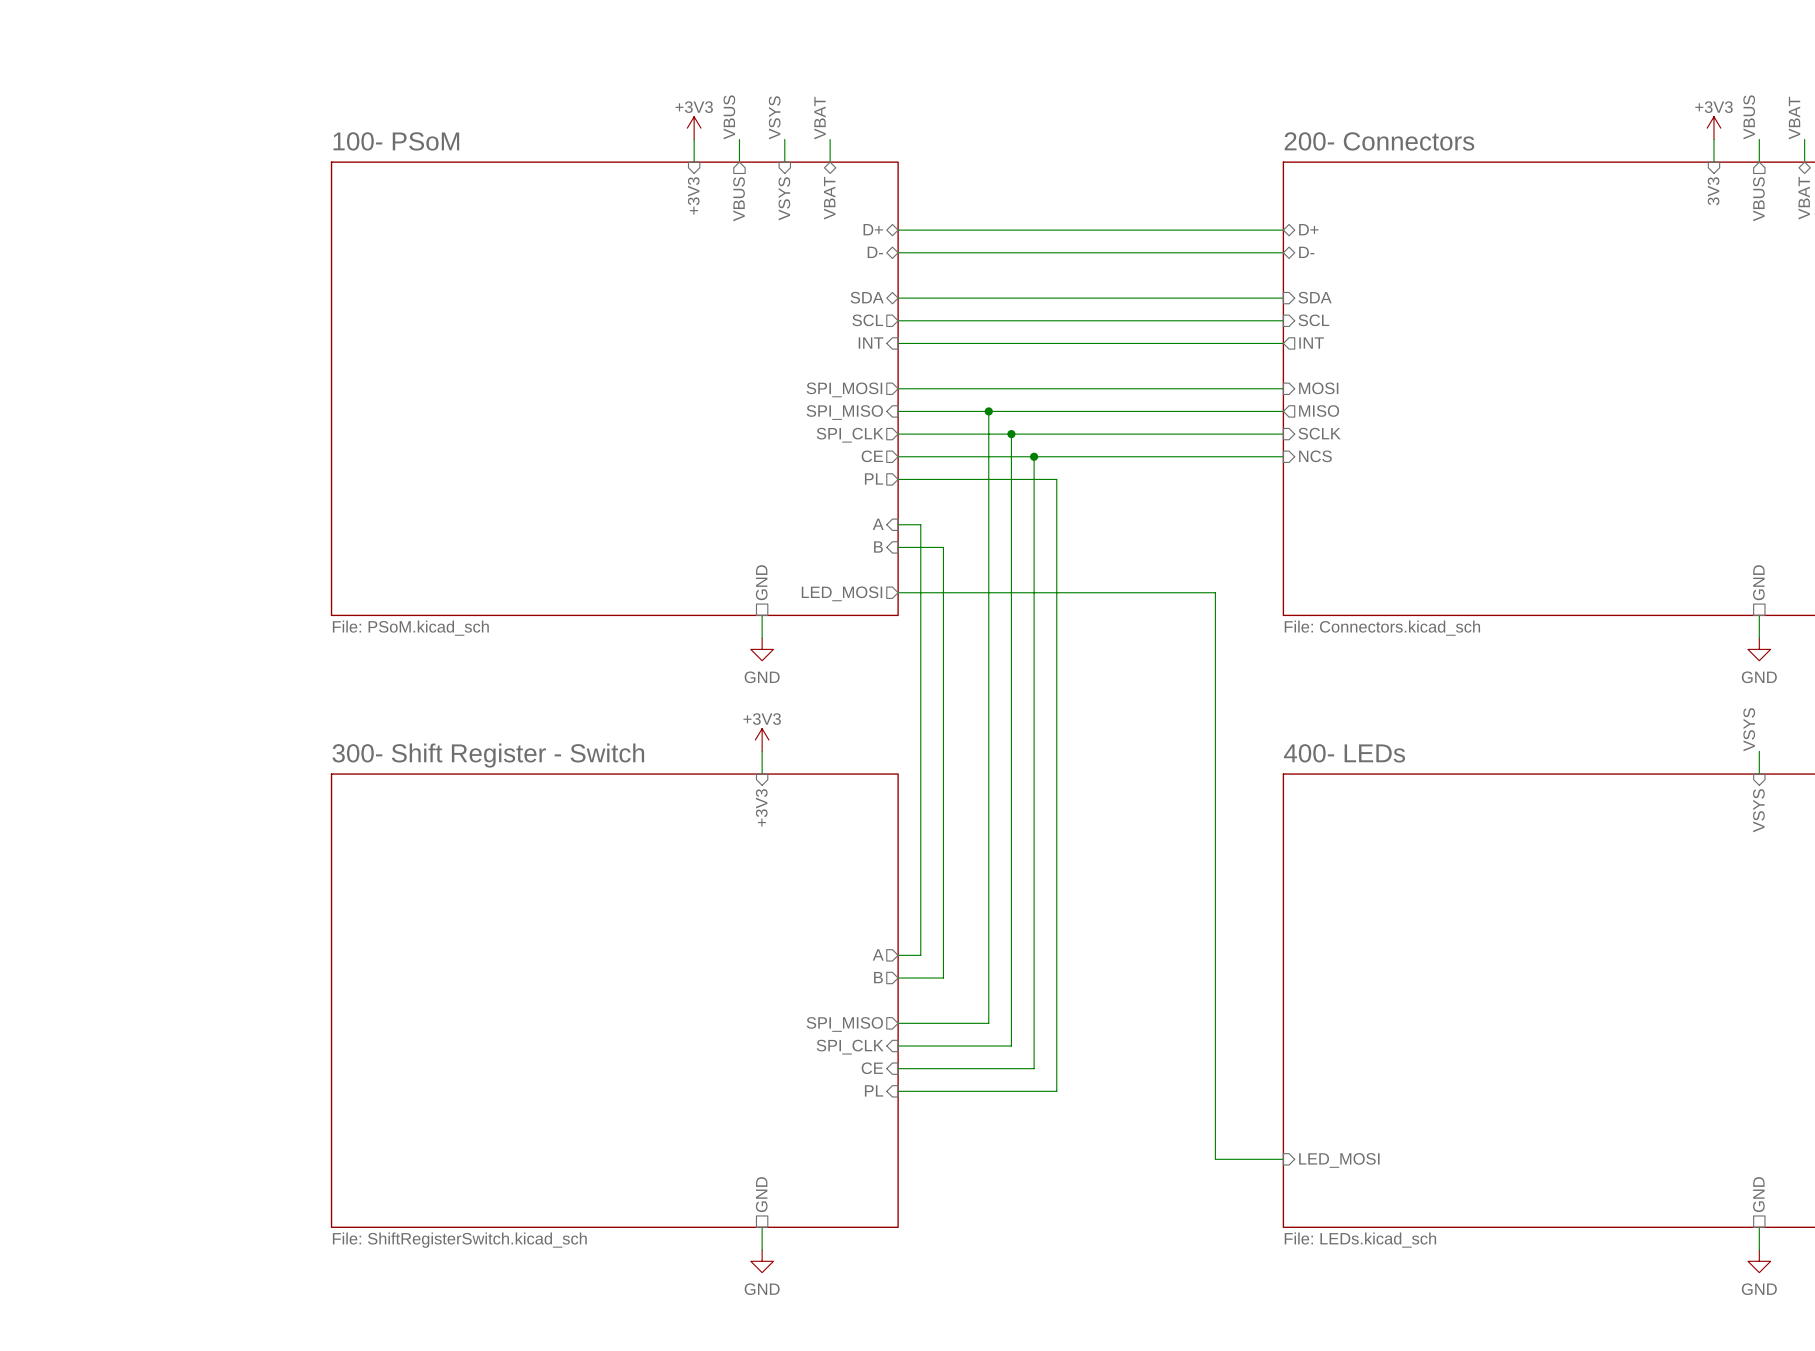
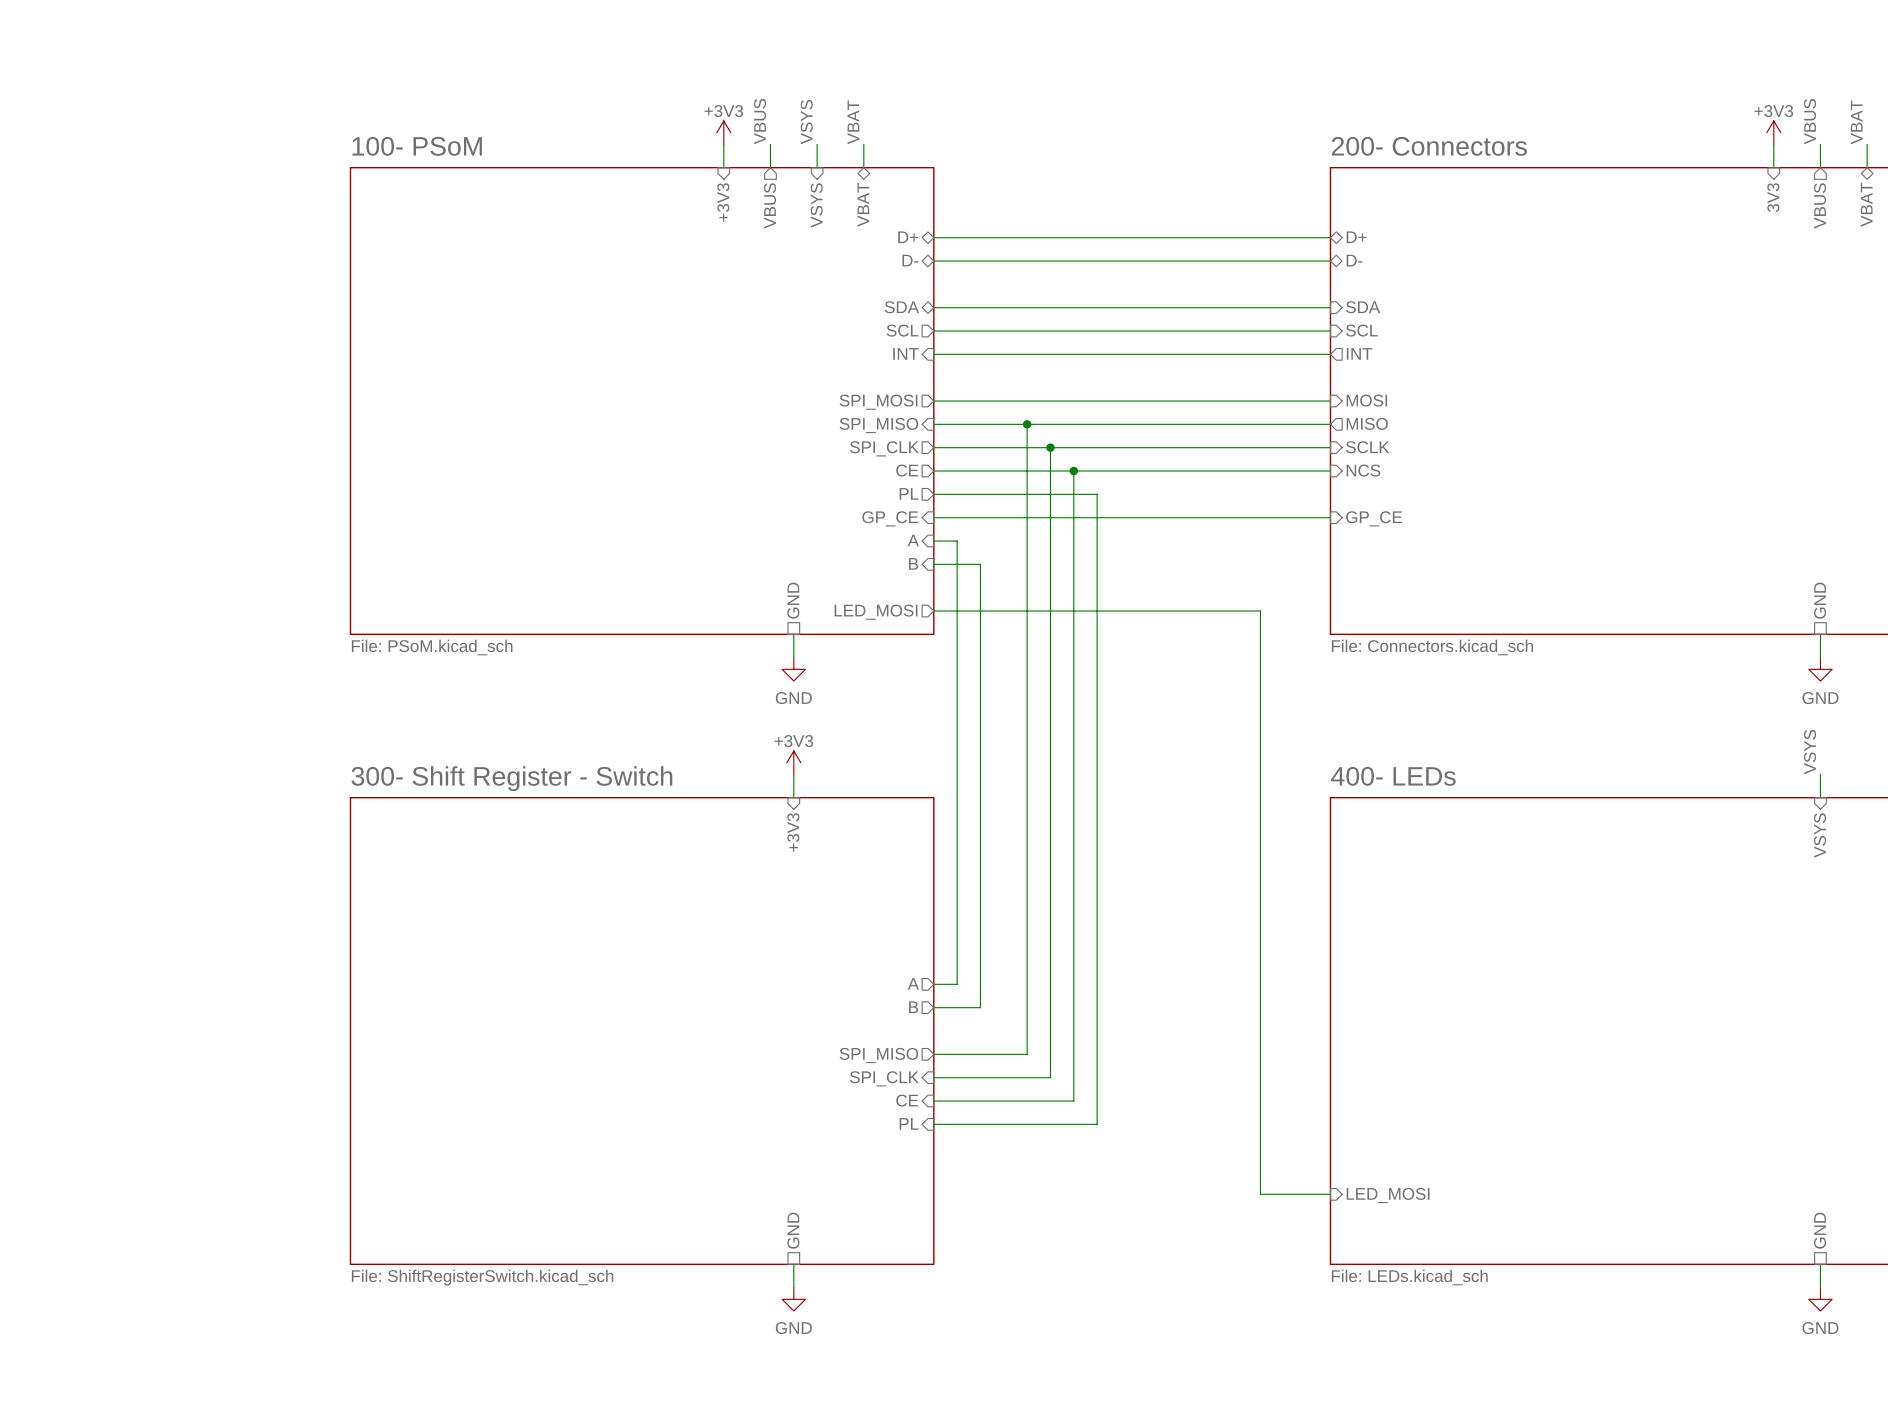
wire: none -> (933, 517) (1330, 517)
sheet pin: none -> GP_CE (890, 518)
sheet pin: none -> GP_CE (1374, 518)

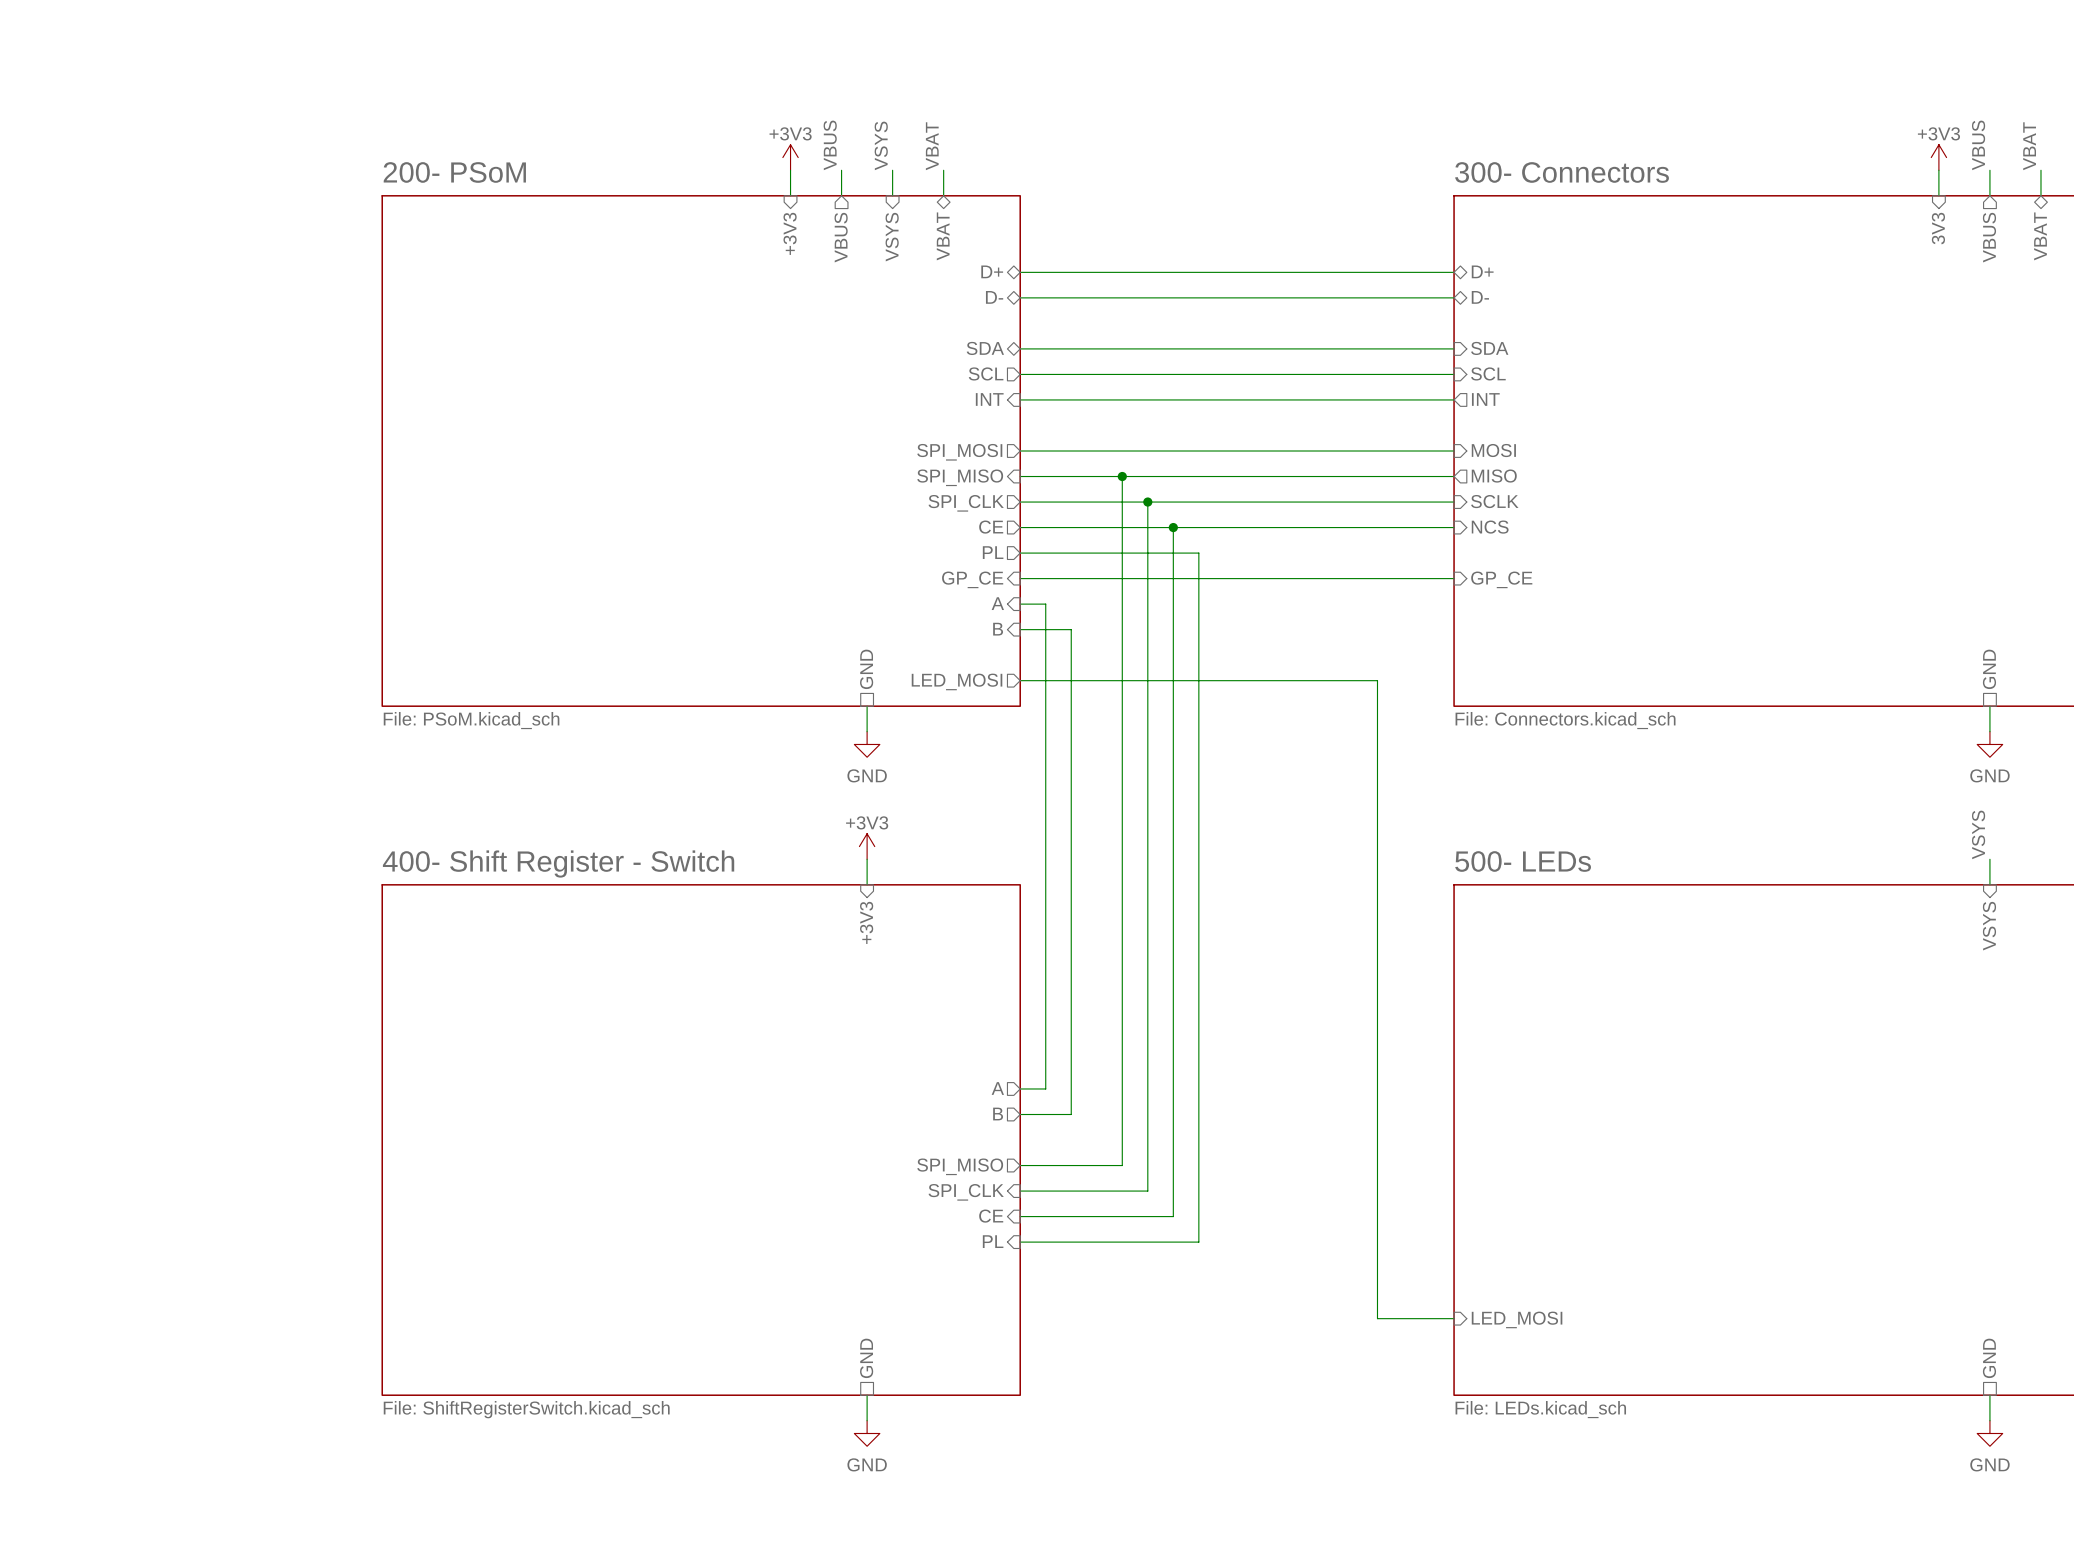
sheet 100- PSoM name: 100- PSoM (417, 146) -> 200- PSoM (454, 172)
sheet 200- Connectors name: 200- Connectors (1429, 146) -> 300- Connectors (1562, 172)
sheet 400- LEDs name: 400- LEDs (1393, 776) -> 500- LEDs (1523, 861)
sheet 300- Shift Register - Switch name: 300- Shift Register - Switch (511, 778) -> 400- Shift Register - Switch (558, 864)

